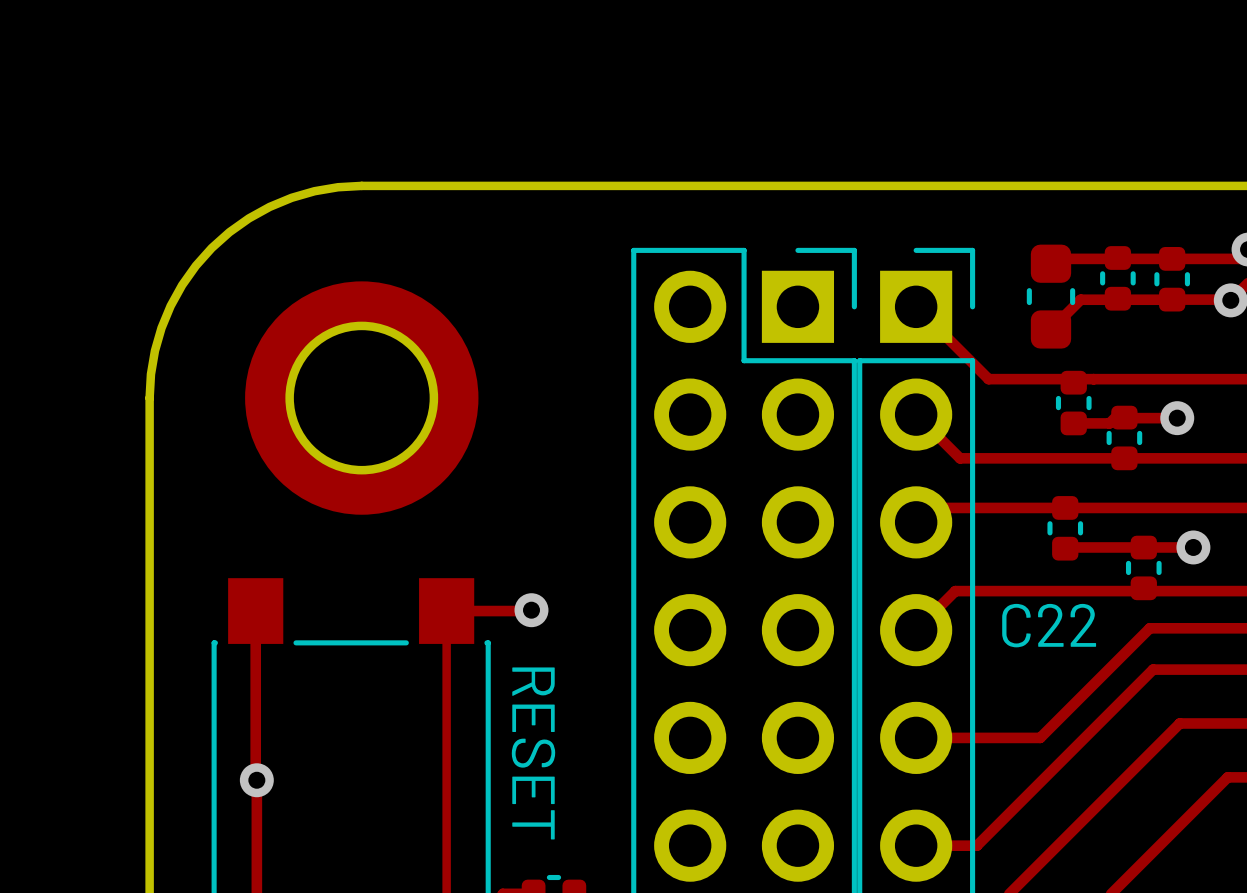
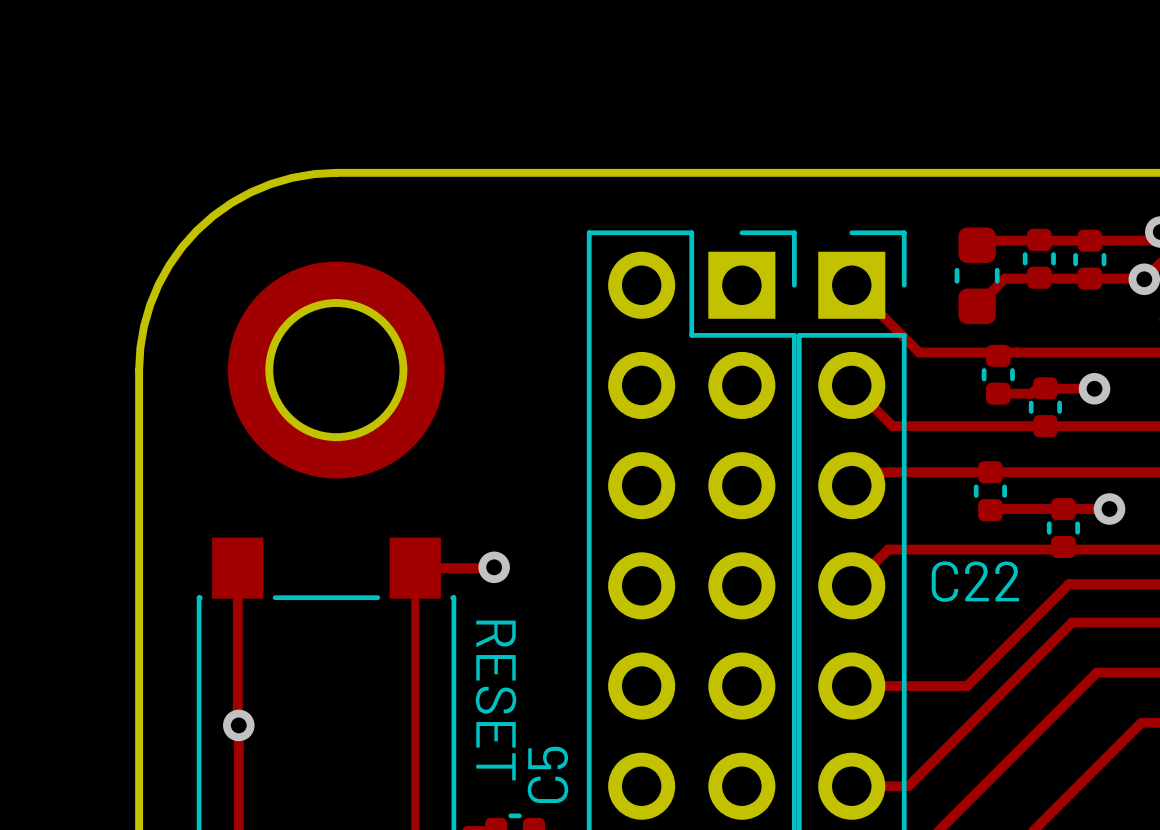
C5 name: none -> C5 (547, 774)

